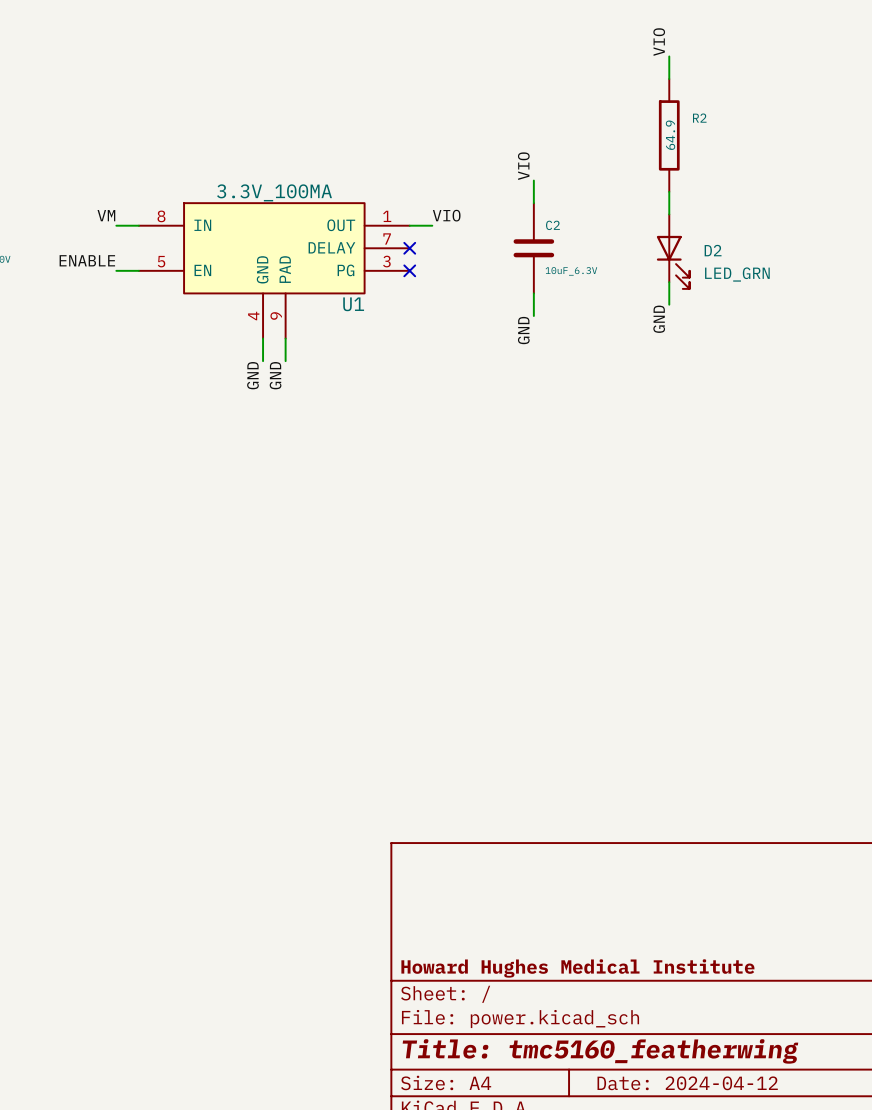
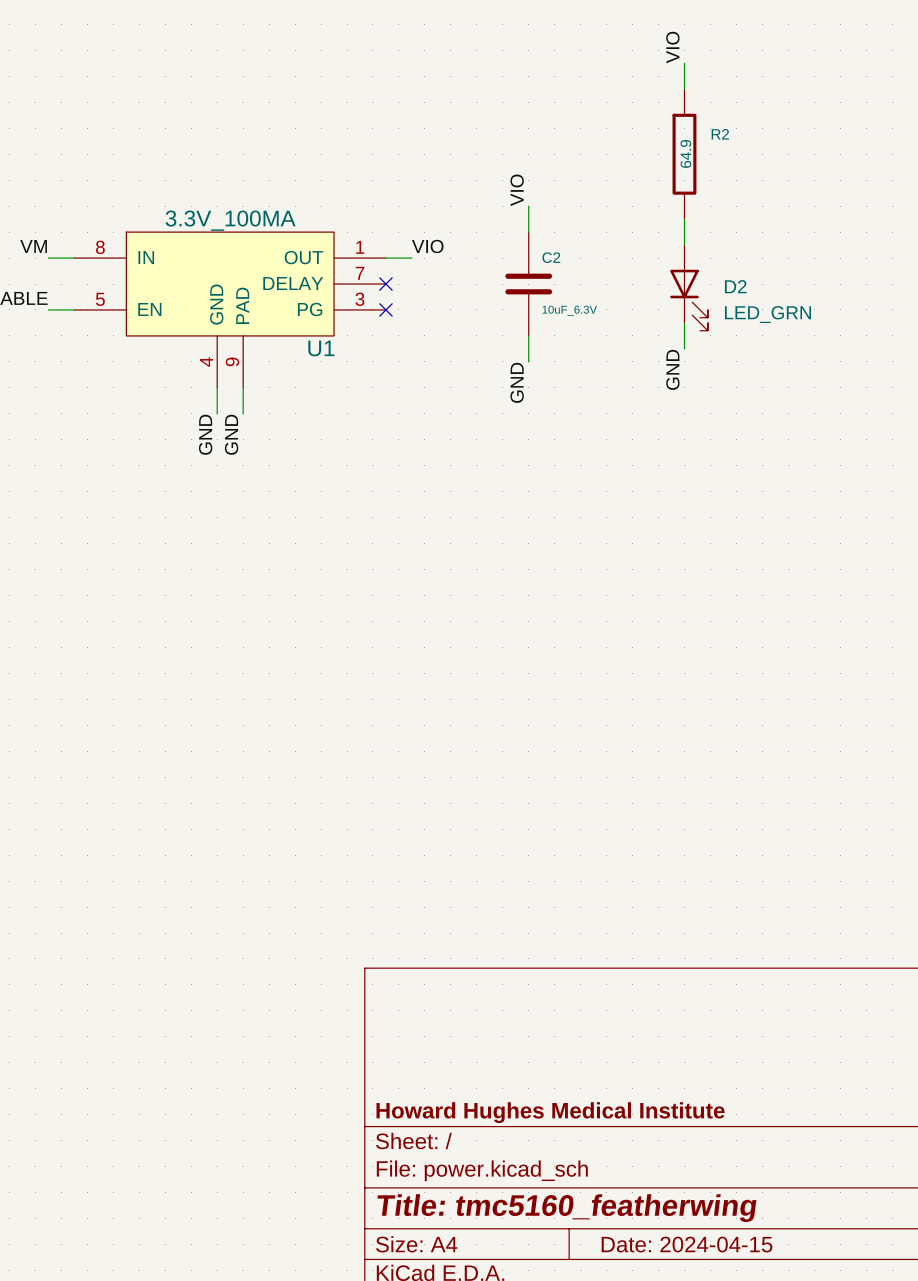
title block: Date: 2024-04-12 (687, 1083) -> Date: 2024-04-15 (687, 1244)

